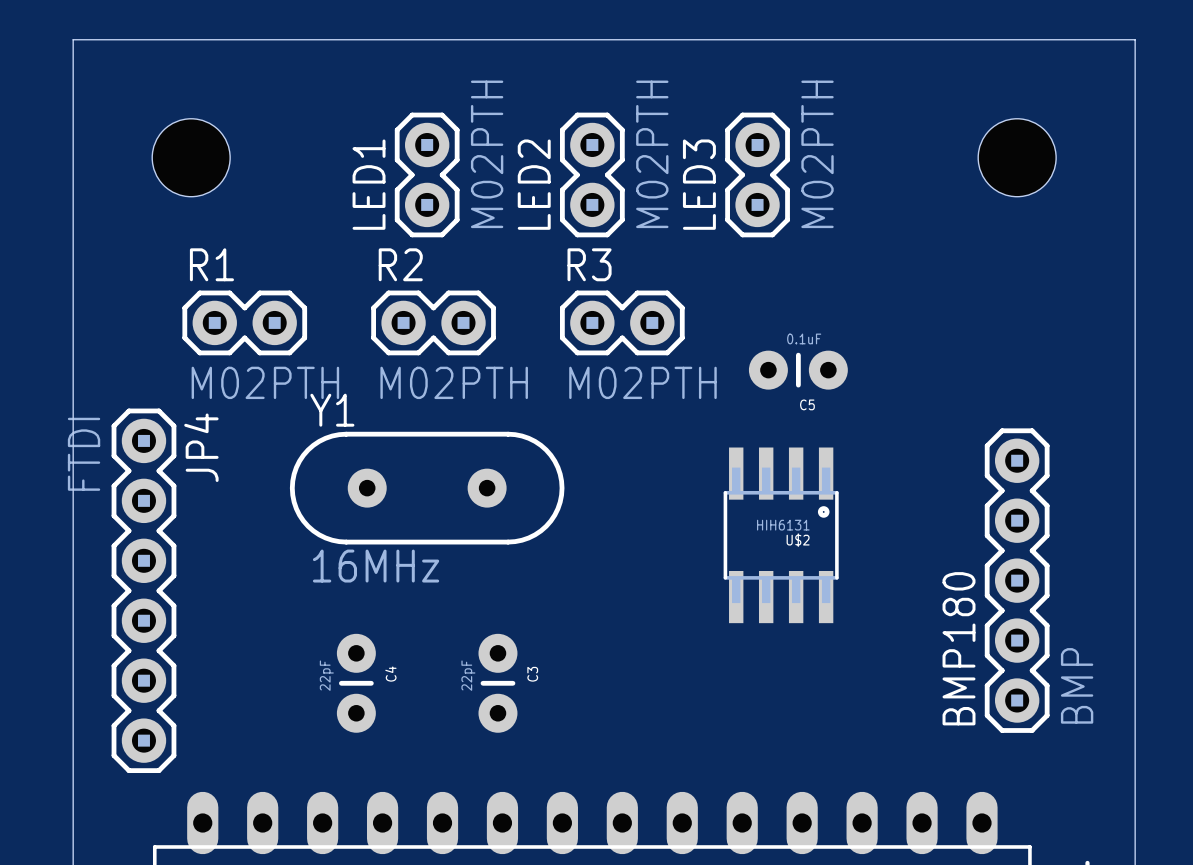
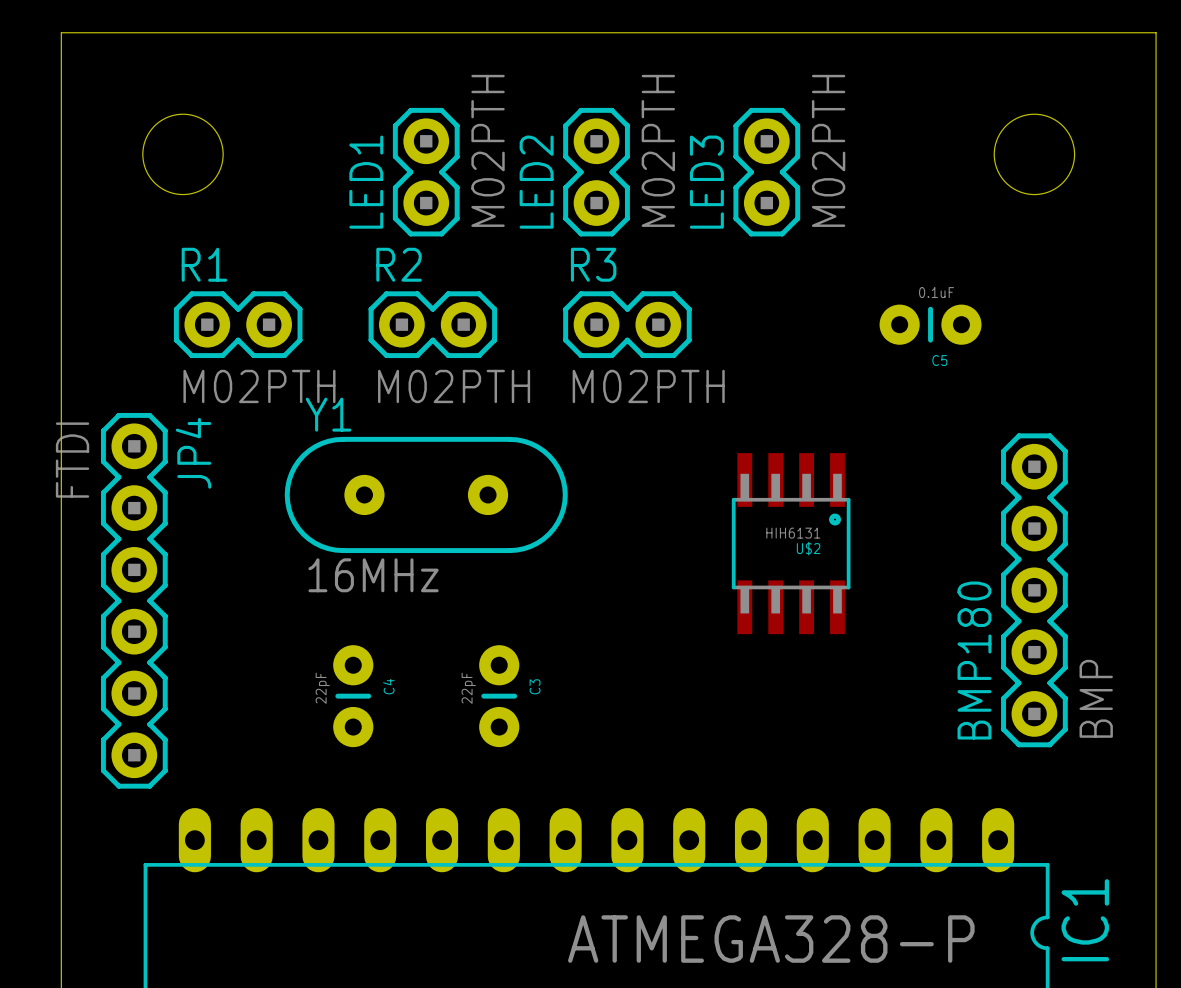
C5 position: (798, 370) -> (930, 324)

